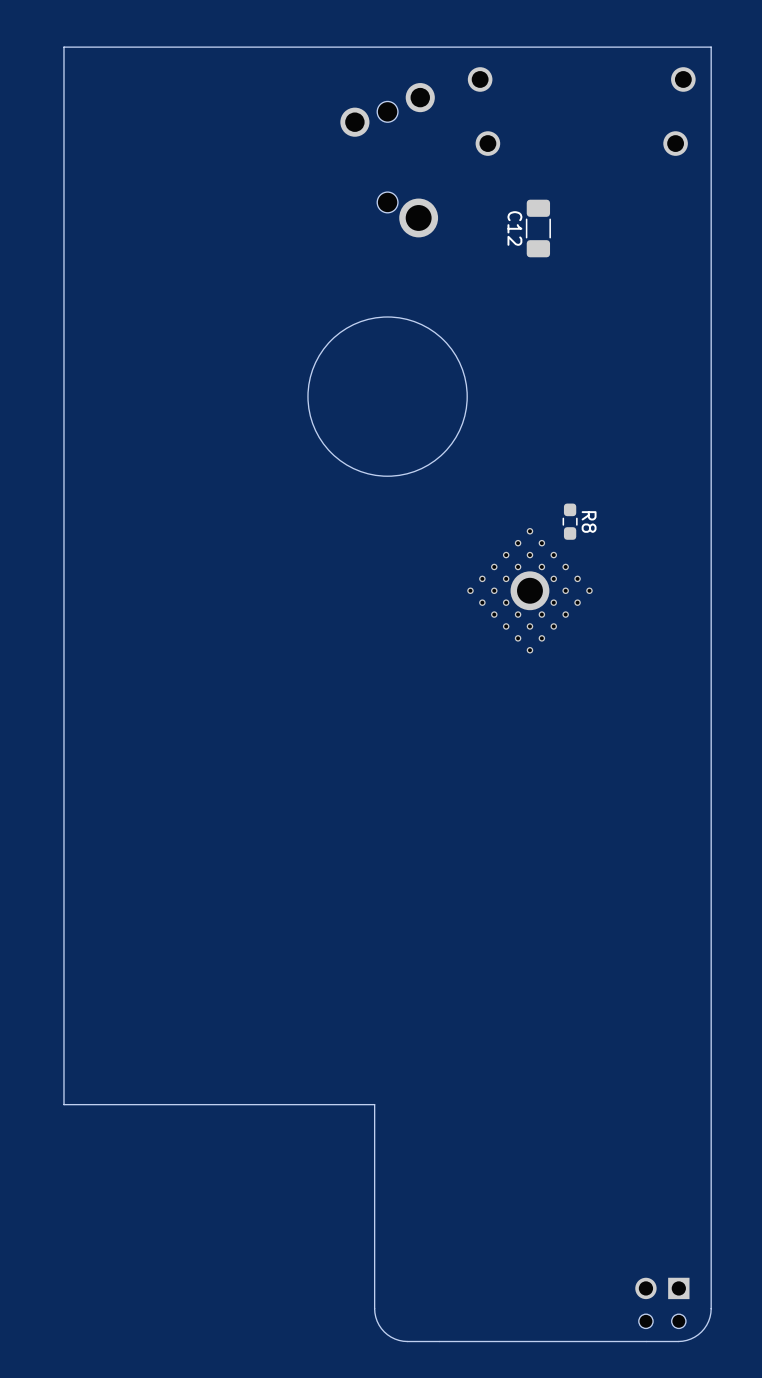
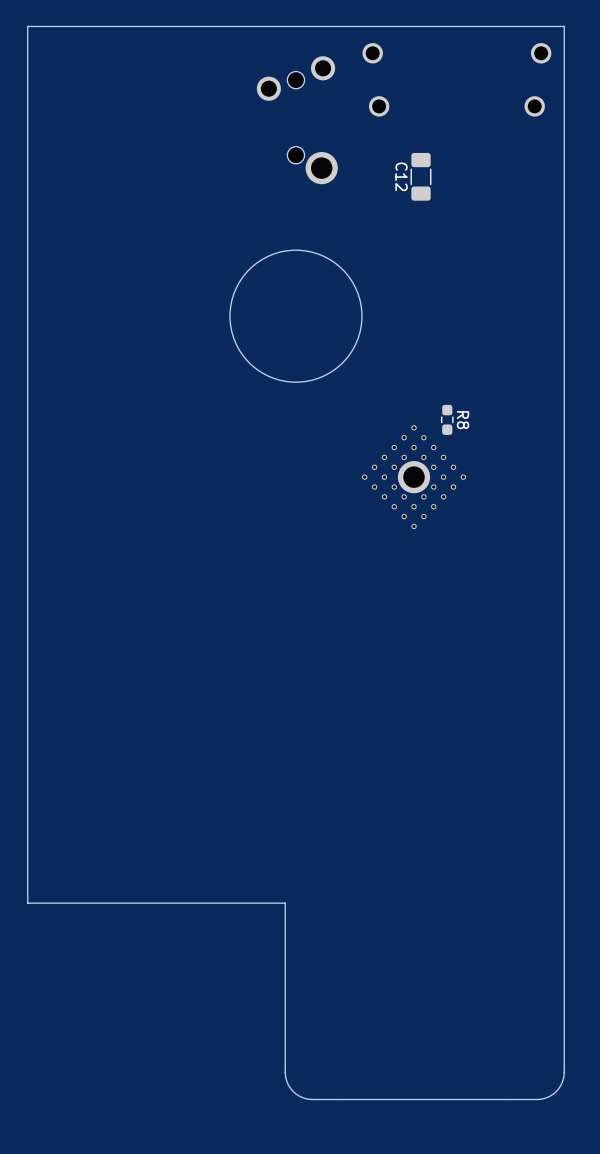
part: (662, 1303) -> none

